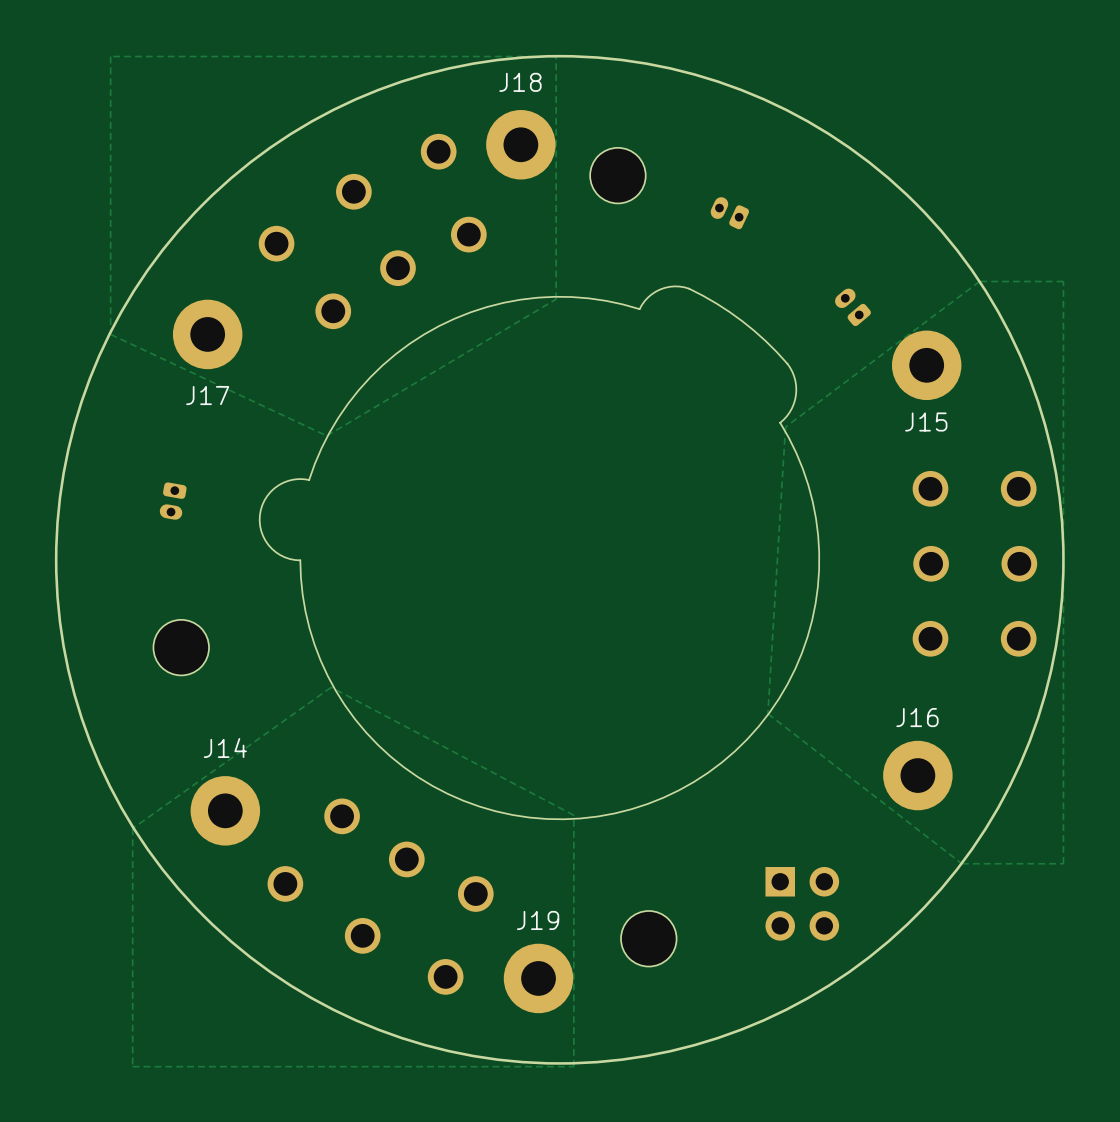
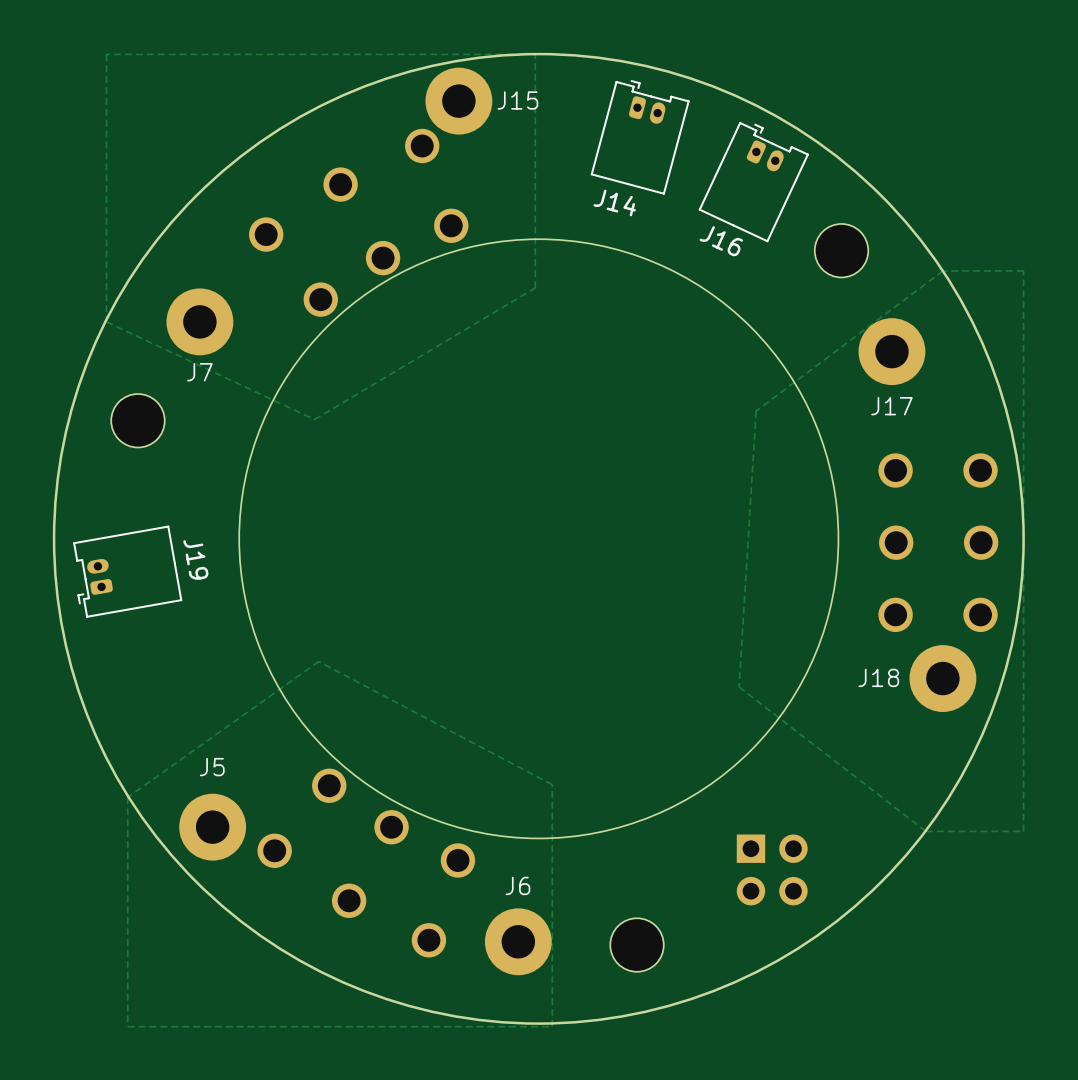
J18 name position: J18 (520, 82) -> J18 (878, 677)
J15: none -> (458, 101)
J18 position: (520, 144) -> (942, 678)
part position: (617, 175) -> (841, 250)
part: (729, 213) -> none
round board edge: none -> [238, 238, 840, 840]
board edge: (689, 288) (729, 311) (754, 330) (787, 363) (794, 376) (796, 390) (793, 403) (786, 416) (780, 422) (796, 452) (808, 485) (815, 518) (819, 552) (817, 586) (812, 620) (795, 668) (769, 713) (735, 751) (693, 781) (647, 804) (597, 816) (546, 818) (495, 811) (447, 793) (417, 777) (390, 756) (366, 732) (335, 691) (320, 660) (309, 628) (302, 594) (300, 560) (280, 555) (268, 544) (262, 535) (259, 520) (264, 500) (274, 488) (283, 482) (293, 479) (309, 480) (329, 432) (358, 390) (395, 354) (438, 326) (486, 307) (520, 299) (572, 297) (606, 300) (639, 309) (648, 297) (660, 289) (674, 286) (689, 288) -> none
part: (852, 307) -> none
J17 name: J17 (207, 395) -> J7 (199, 372)
J15 name: J15 (926, 422) -> J17 (891, 406)
part: (173, 501) -> none
J19: none -> (127, 571)
part position: (181, 647) -> (137, 420)
J16 name position: J16 (917, 717) -> J16 (721, 241)
J16 footprint: [883, 740, 953, 811] -> [698, 122, 809, 243]
J14 name position: J14 (225, 748) -> J14 (614, 202)
J14 footprint: [190, 776, 261, 846] -> [590, 80, 690, 195]
J5: none -> (212, 827)
J19 name: J19 (538, 920) -> J6 (517, 885)
part position: (648, 938) -> (637, 945)

